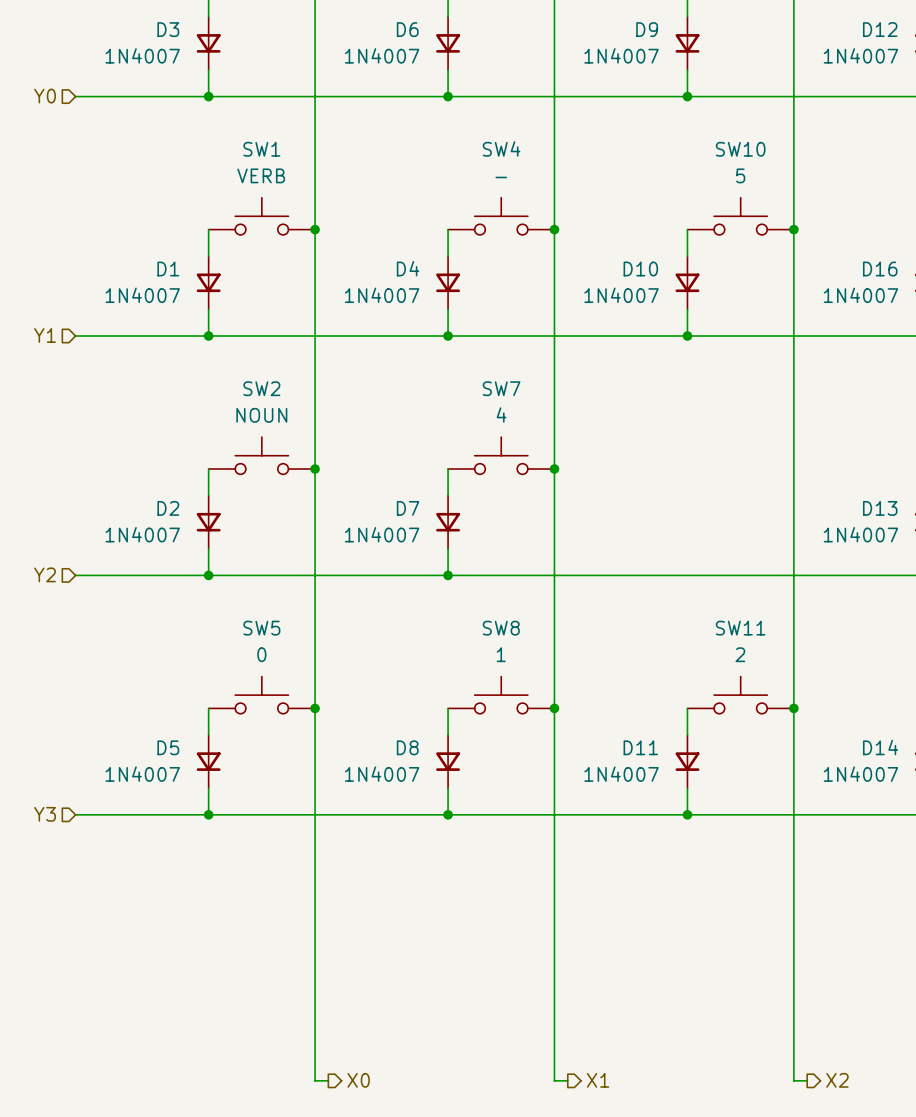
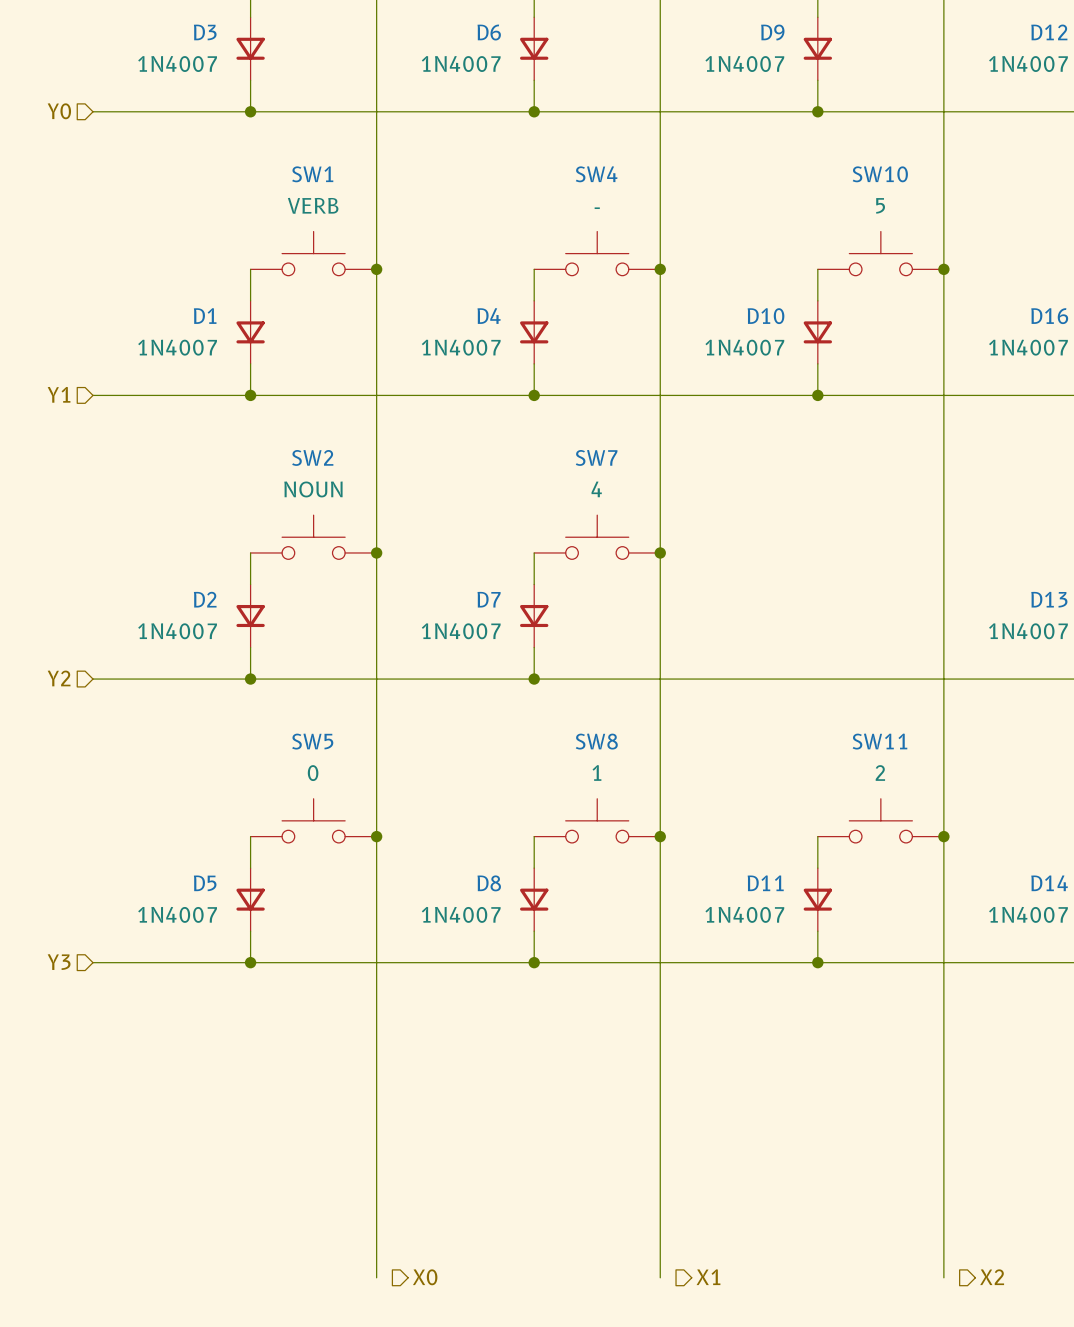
wire: (315, 1080) (328, 1080) -> none
wire: (554, 1080) (567, 1080) -> none
wire: (793, 1080) (807, 1080) -> none

